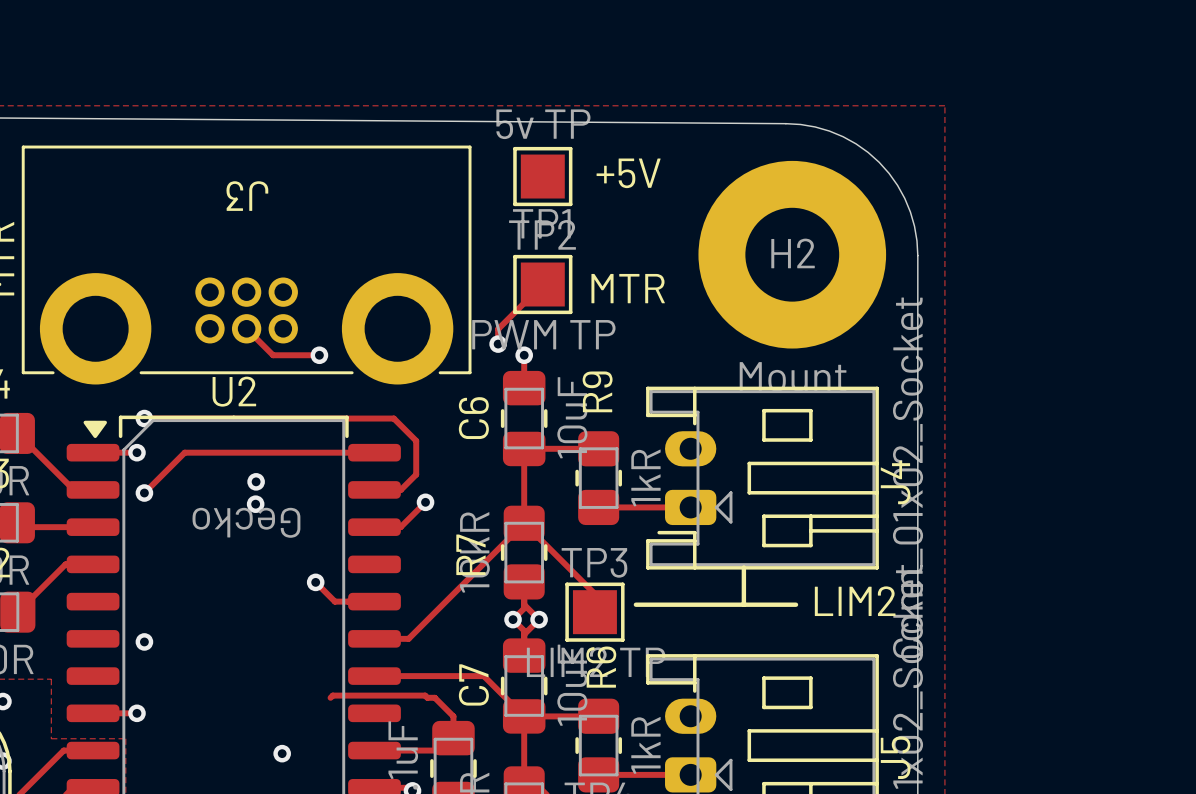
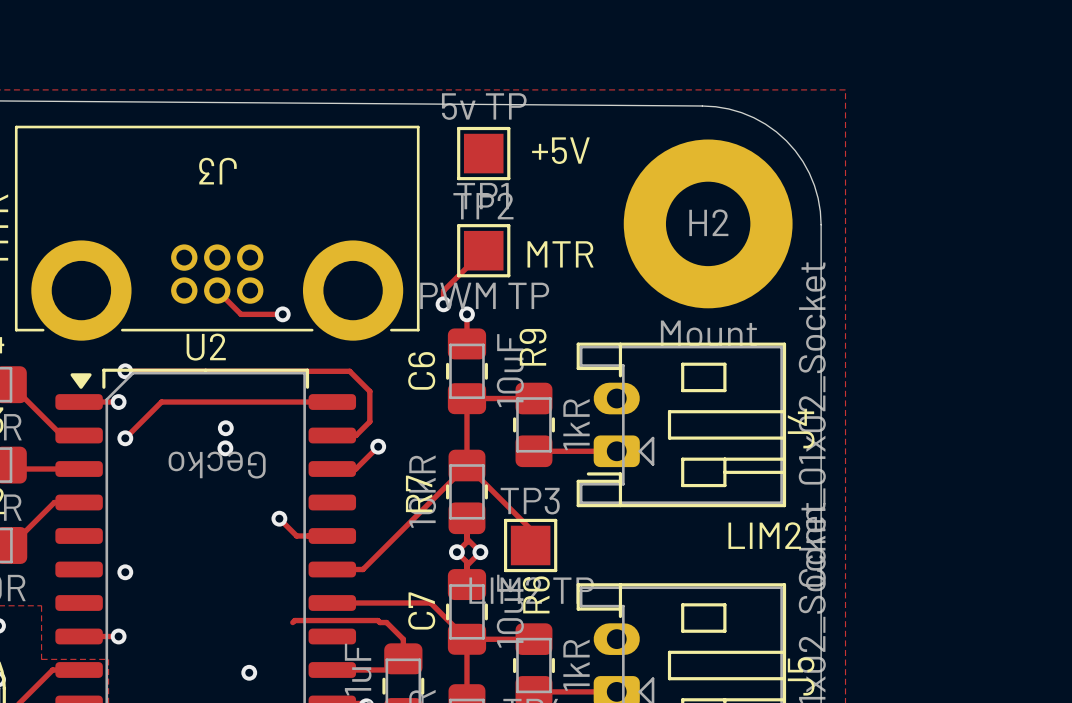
line: (743, 567) (743, 604) -> none
line: (635, 604) (796, 604) -> none

